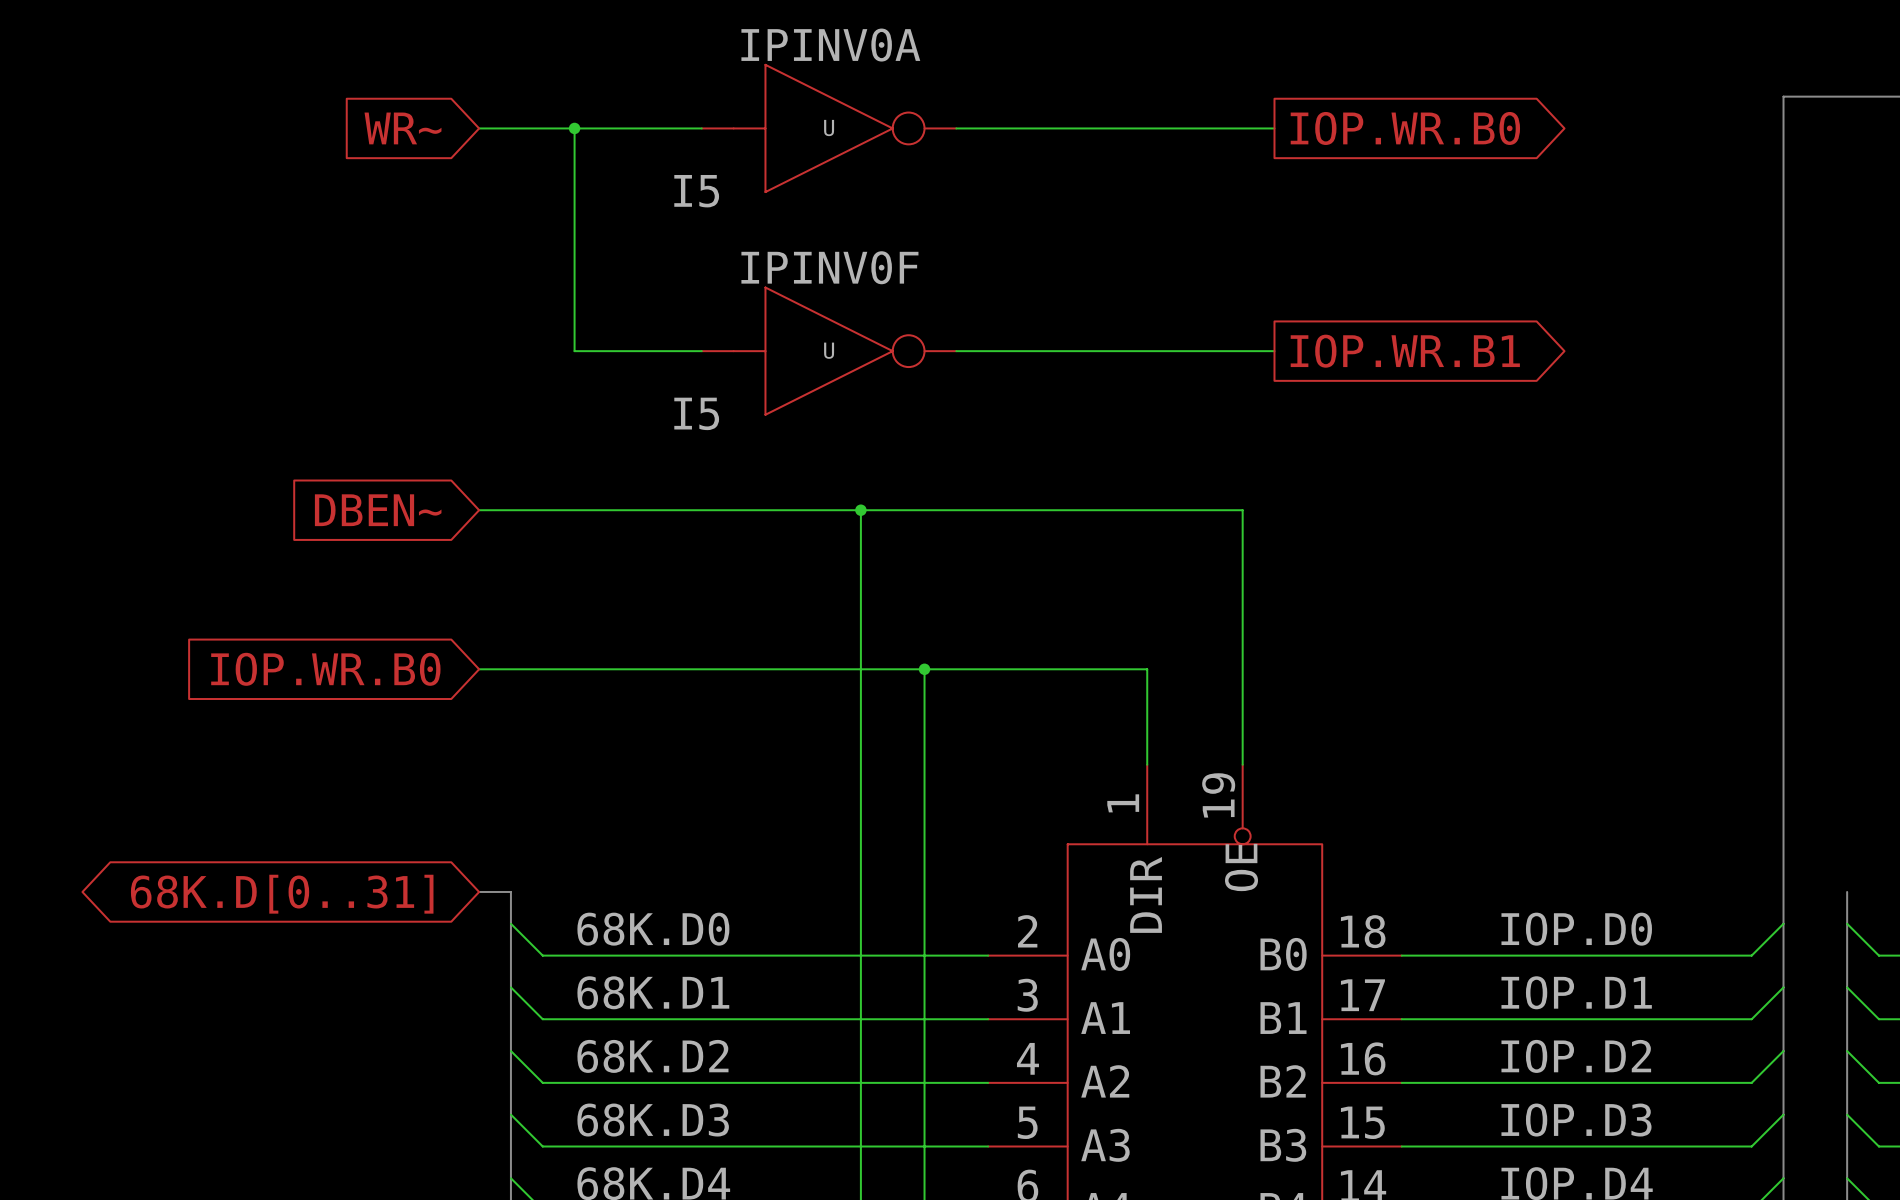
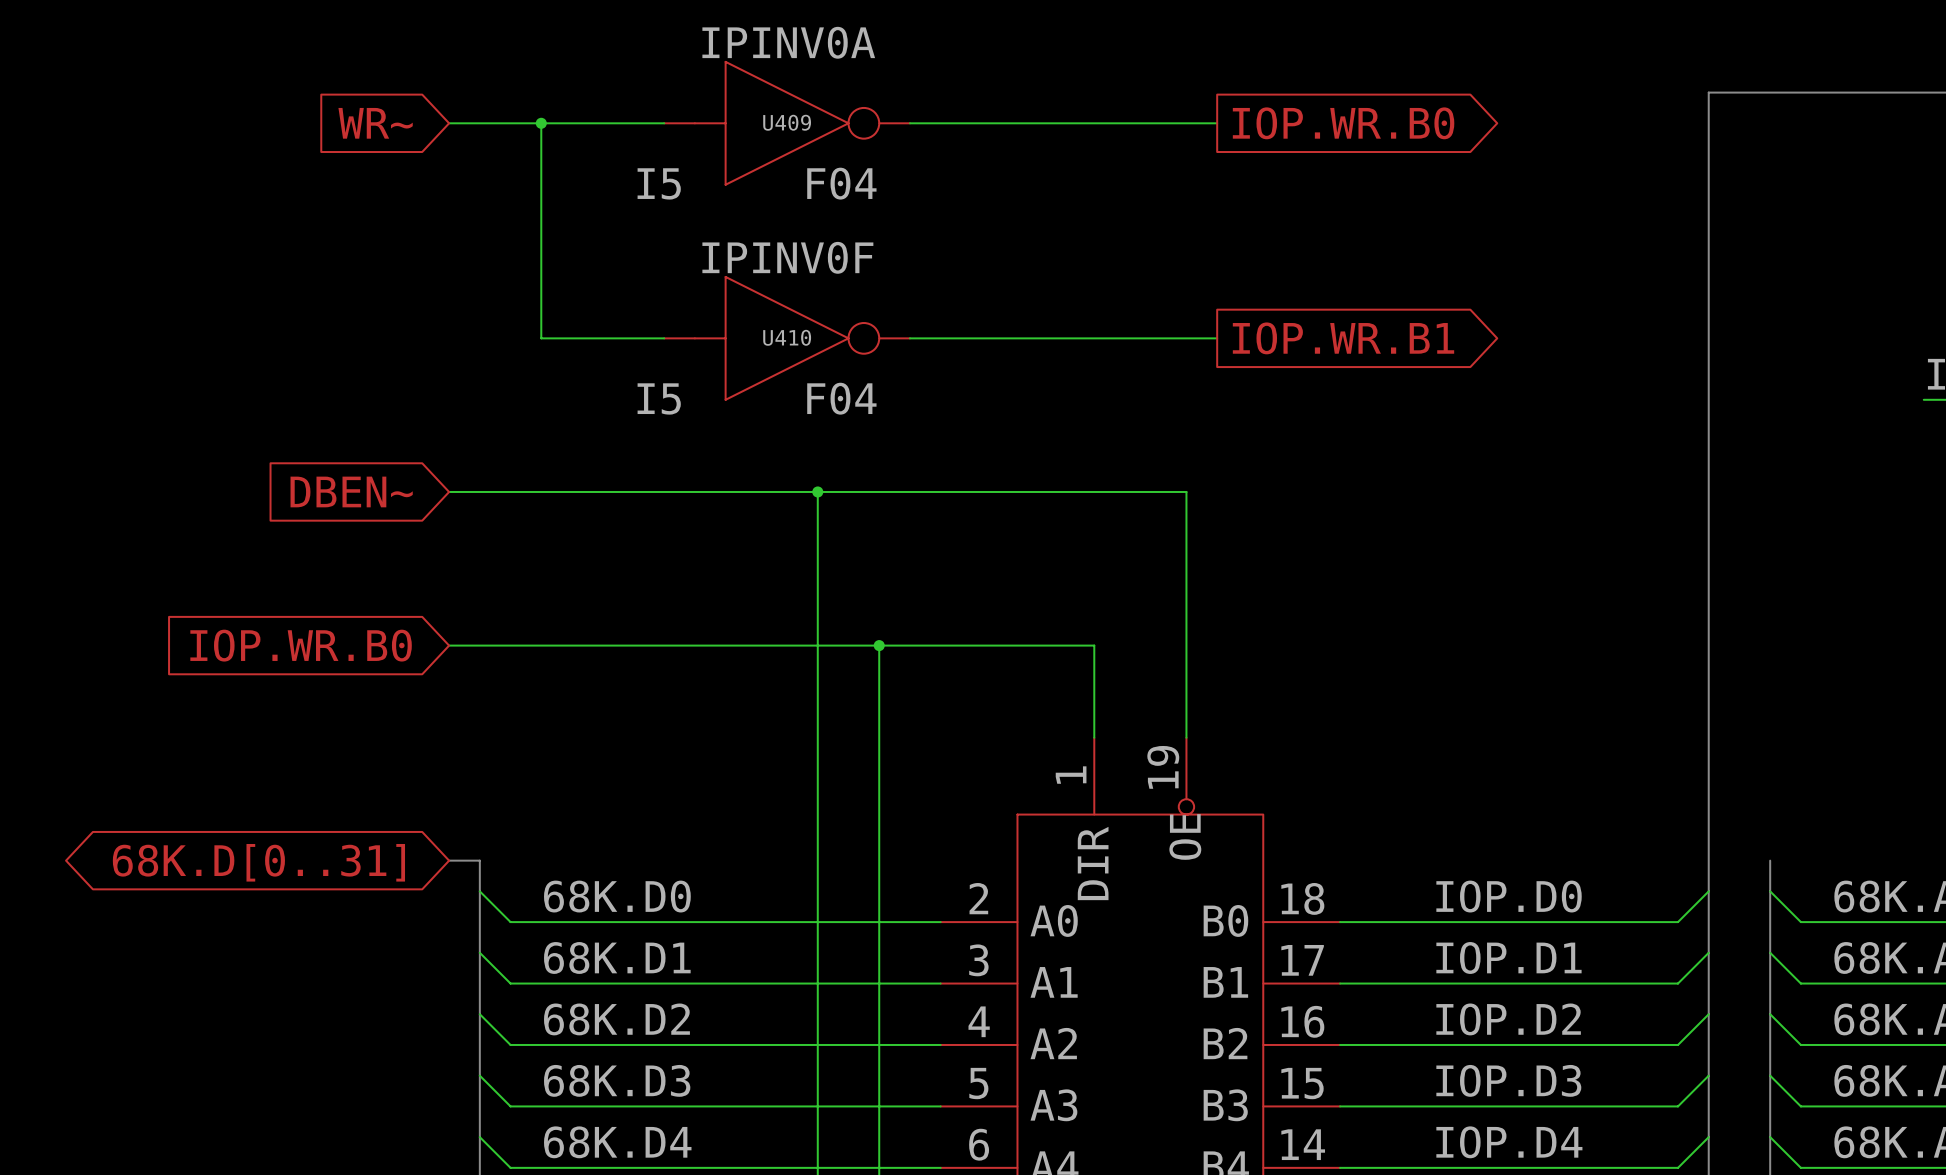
U name: U (829, 128) -> U409 (787, 122)
U value: none -> F04 (841, 183)
U name: U (829, 350) -> U410 (787, 337)
U value: none -> F04 (841, 398)

